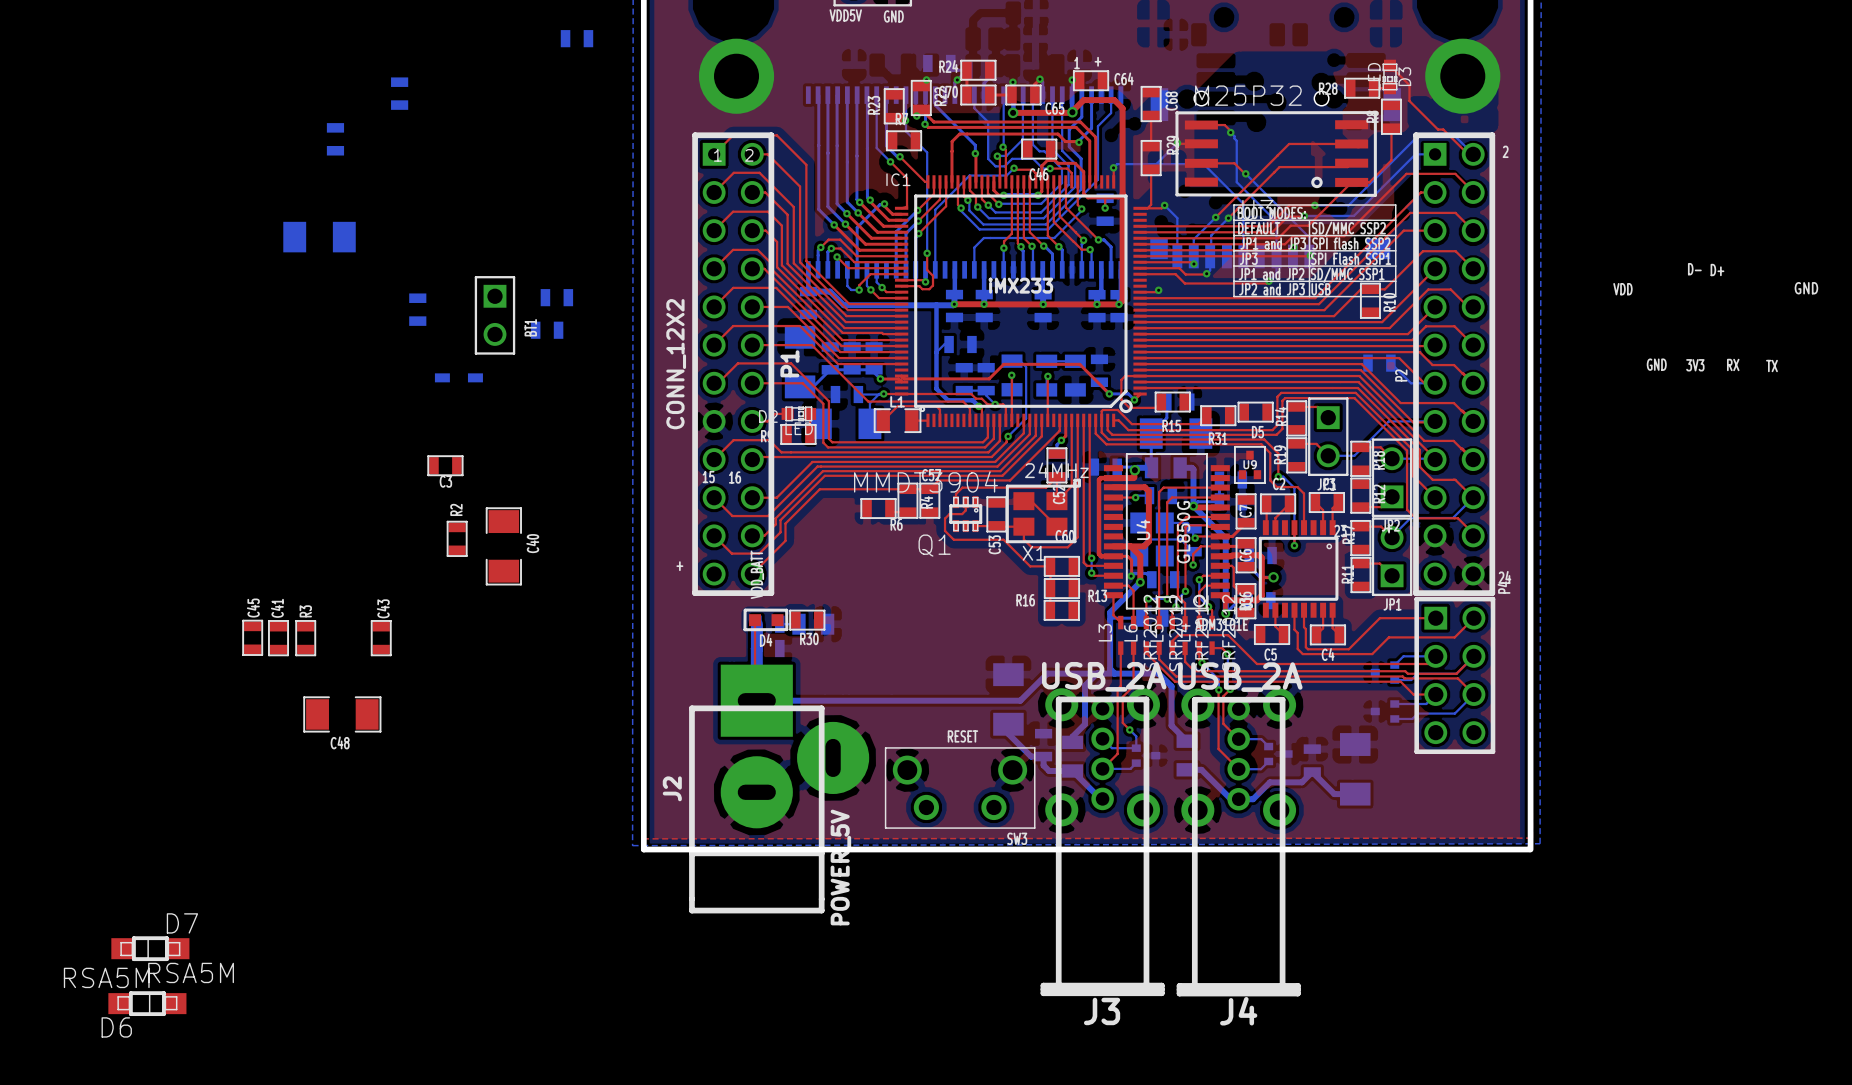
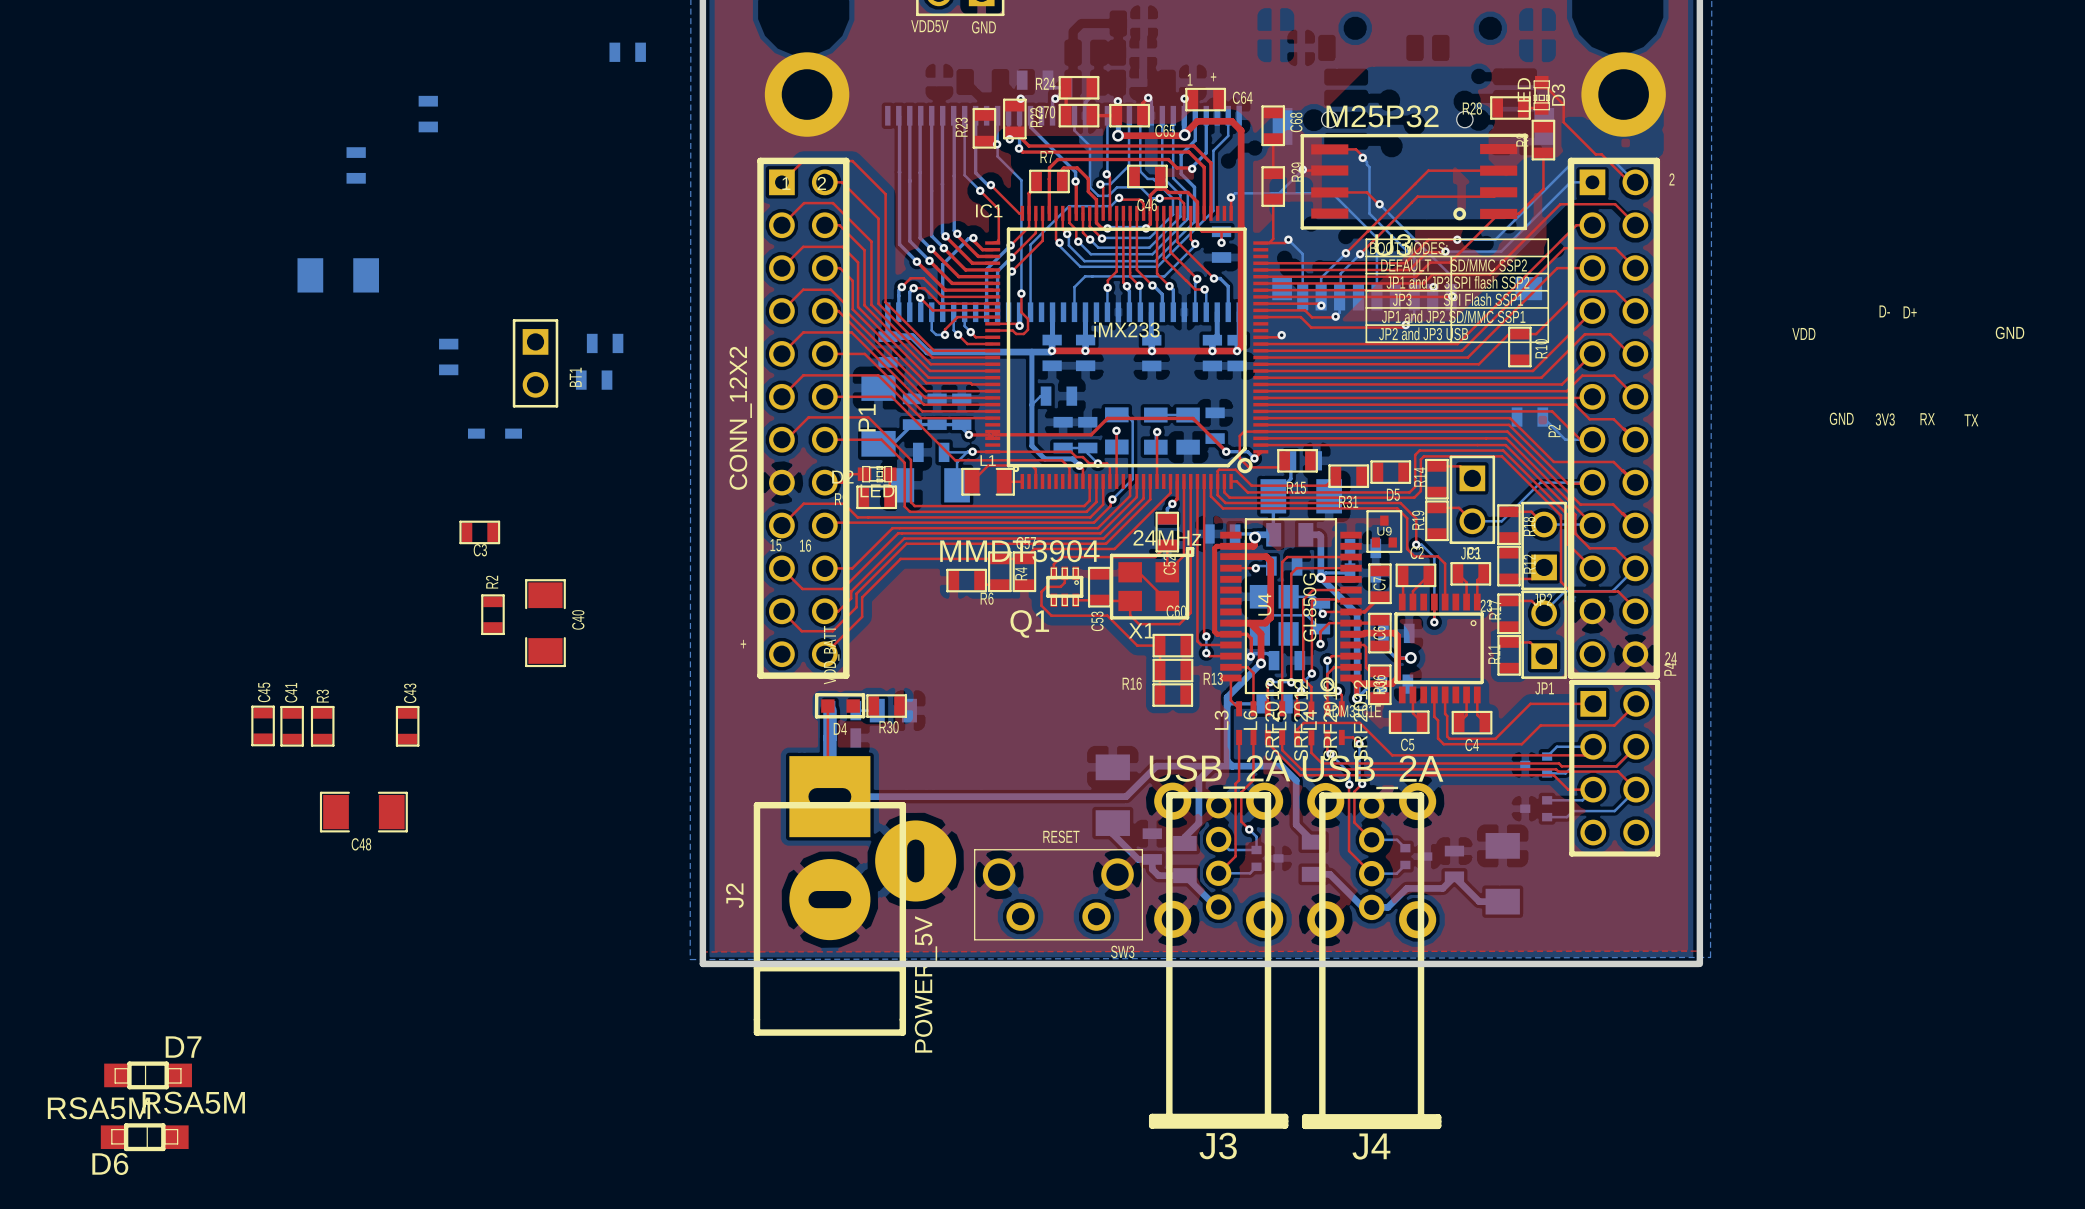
R7 position: (904, 140) -> (1049, 181)
top track: none -> (1036, 181) (1036, 185) (1029, 193) (1029, 213)
top track: none -> (1062, 181) (1063, 167) (1077, 167) (1088, 178) (1088, 191) (1096, 199) (1096, 213)

